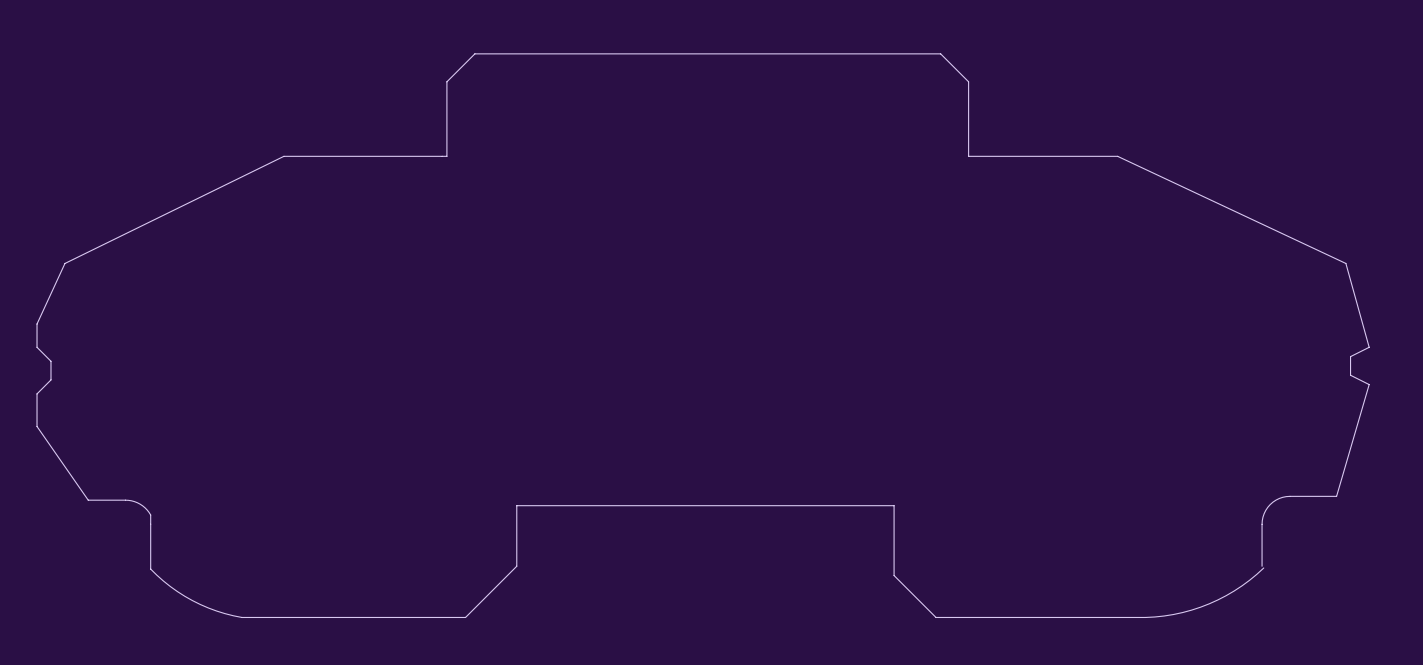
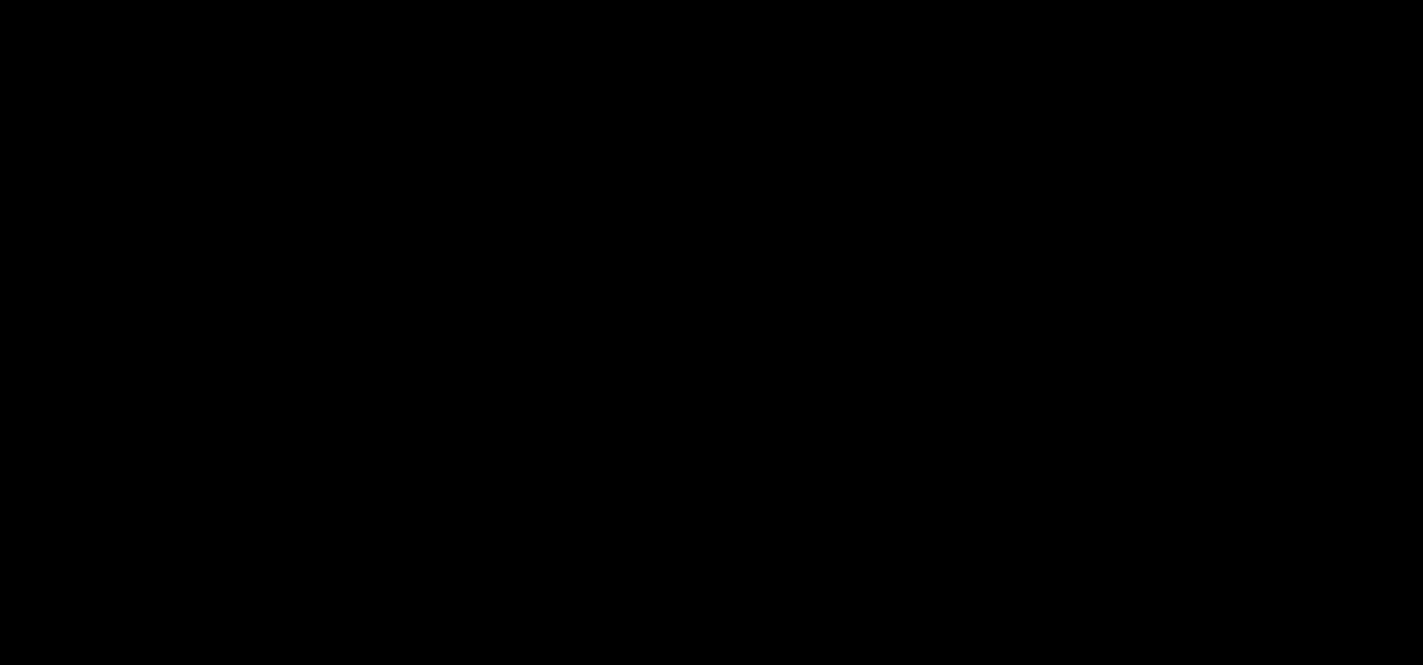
board edge: (1262, 566) (1262, 520) (1270, 504) (1286, 496) (1336, 496) (1369, 384) (1350, 375) (1350, 356) (1369, 347) (1345, 263) (1117, 156) (968, 156) (968, 81) (940, 53) (474, 53) (446, 81) (446, 156) (283, 156) (64, 263) (37, 324) (37, 347) (50, 361) (50, 379) (37, 393) (37, 426) (88, 500) (131, 500) (147, 510) (150, 514) (150, 569) (156, 575) (192, 600) (233, 615) (241, 617) (465, 617) (516, 566) (516, 505) (894, 505) (894, 575) (935, 617) (1164, 615) (1191, 610) (1217, 599) (1242, 585) (1263, 568) -> none

